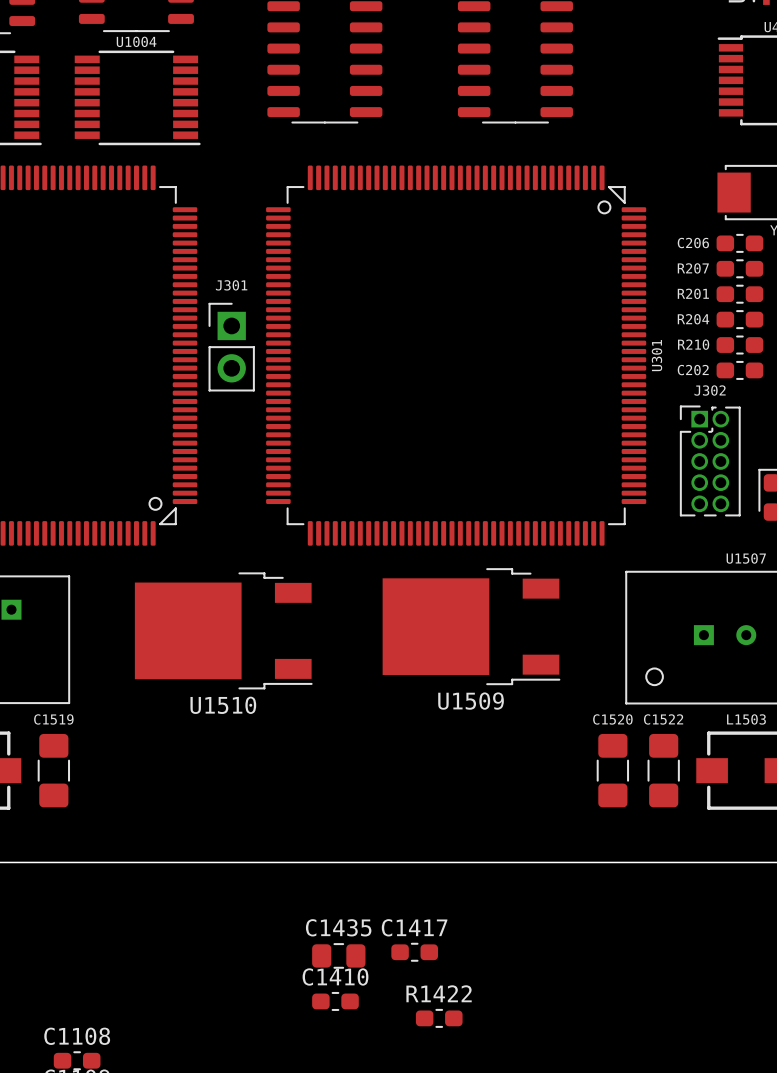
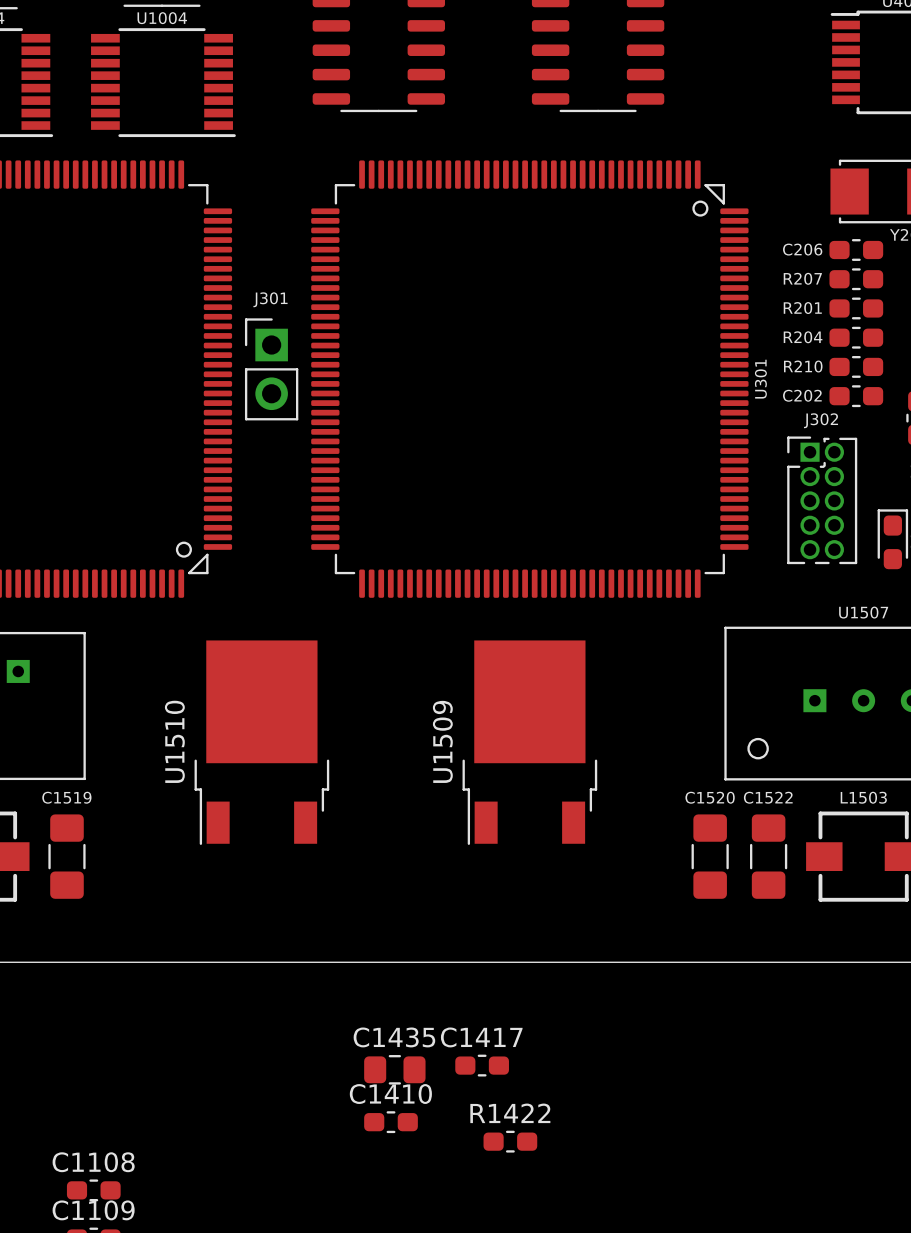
U1509 rotation: 0° (471, 626) -> 90° clockwise (529, 742)
U1510 rotation: 0° (223, 630) -> 90° clockwise (261, 742)

